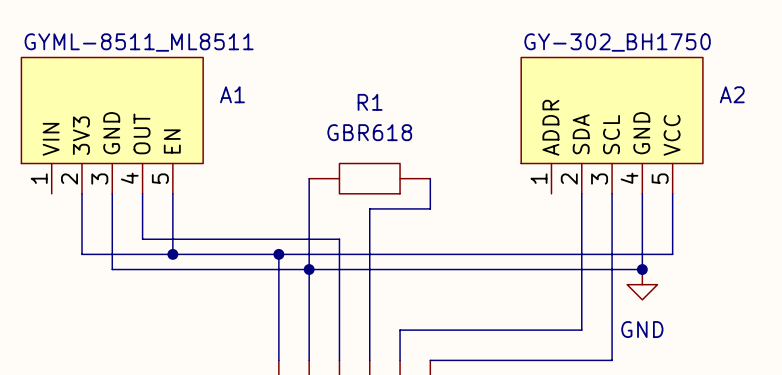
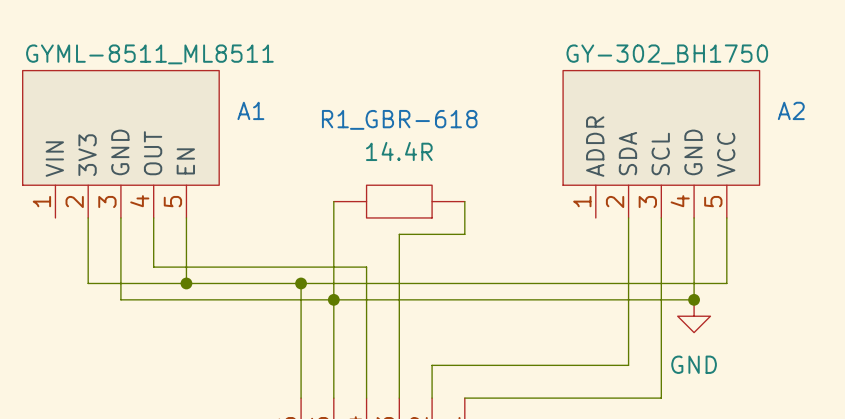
R1 name: R1 (370, 102) -> R1_GBR-618 (399, 119)
R1 value: GBR618 (369, 132) -> 14.4R (399, 151)

